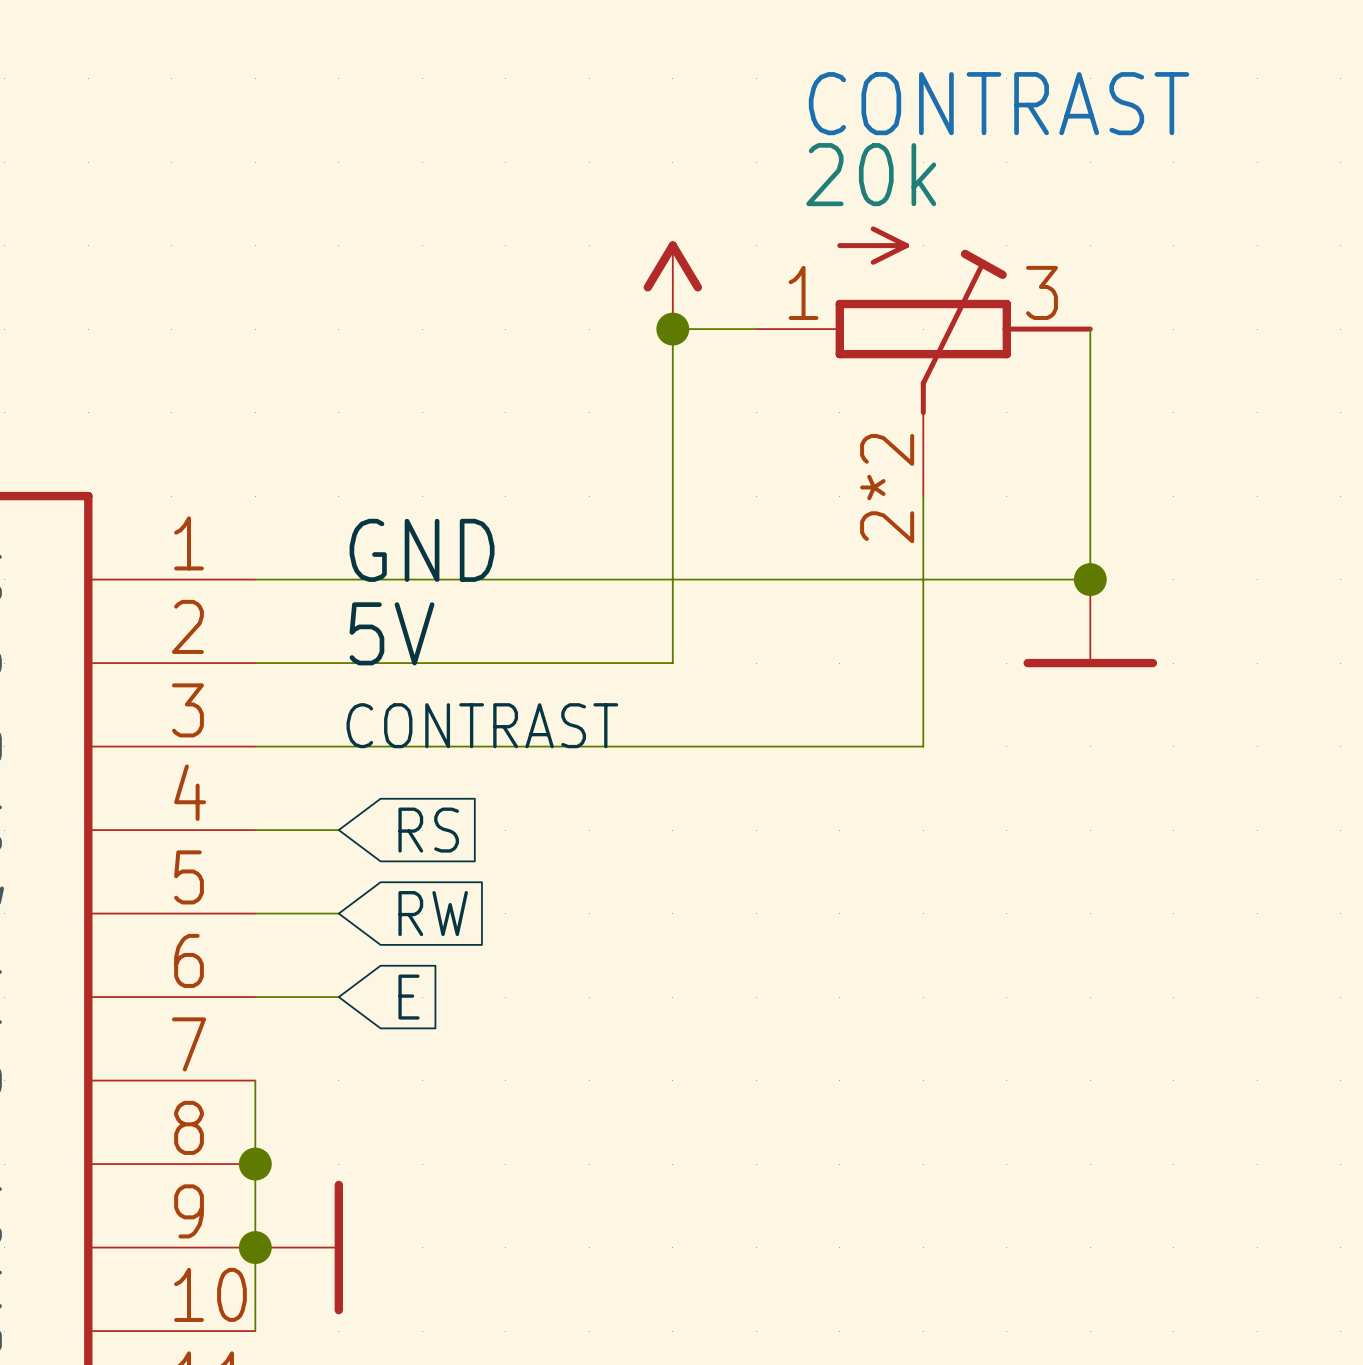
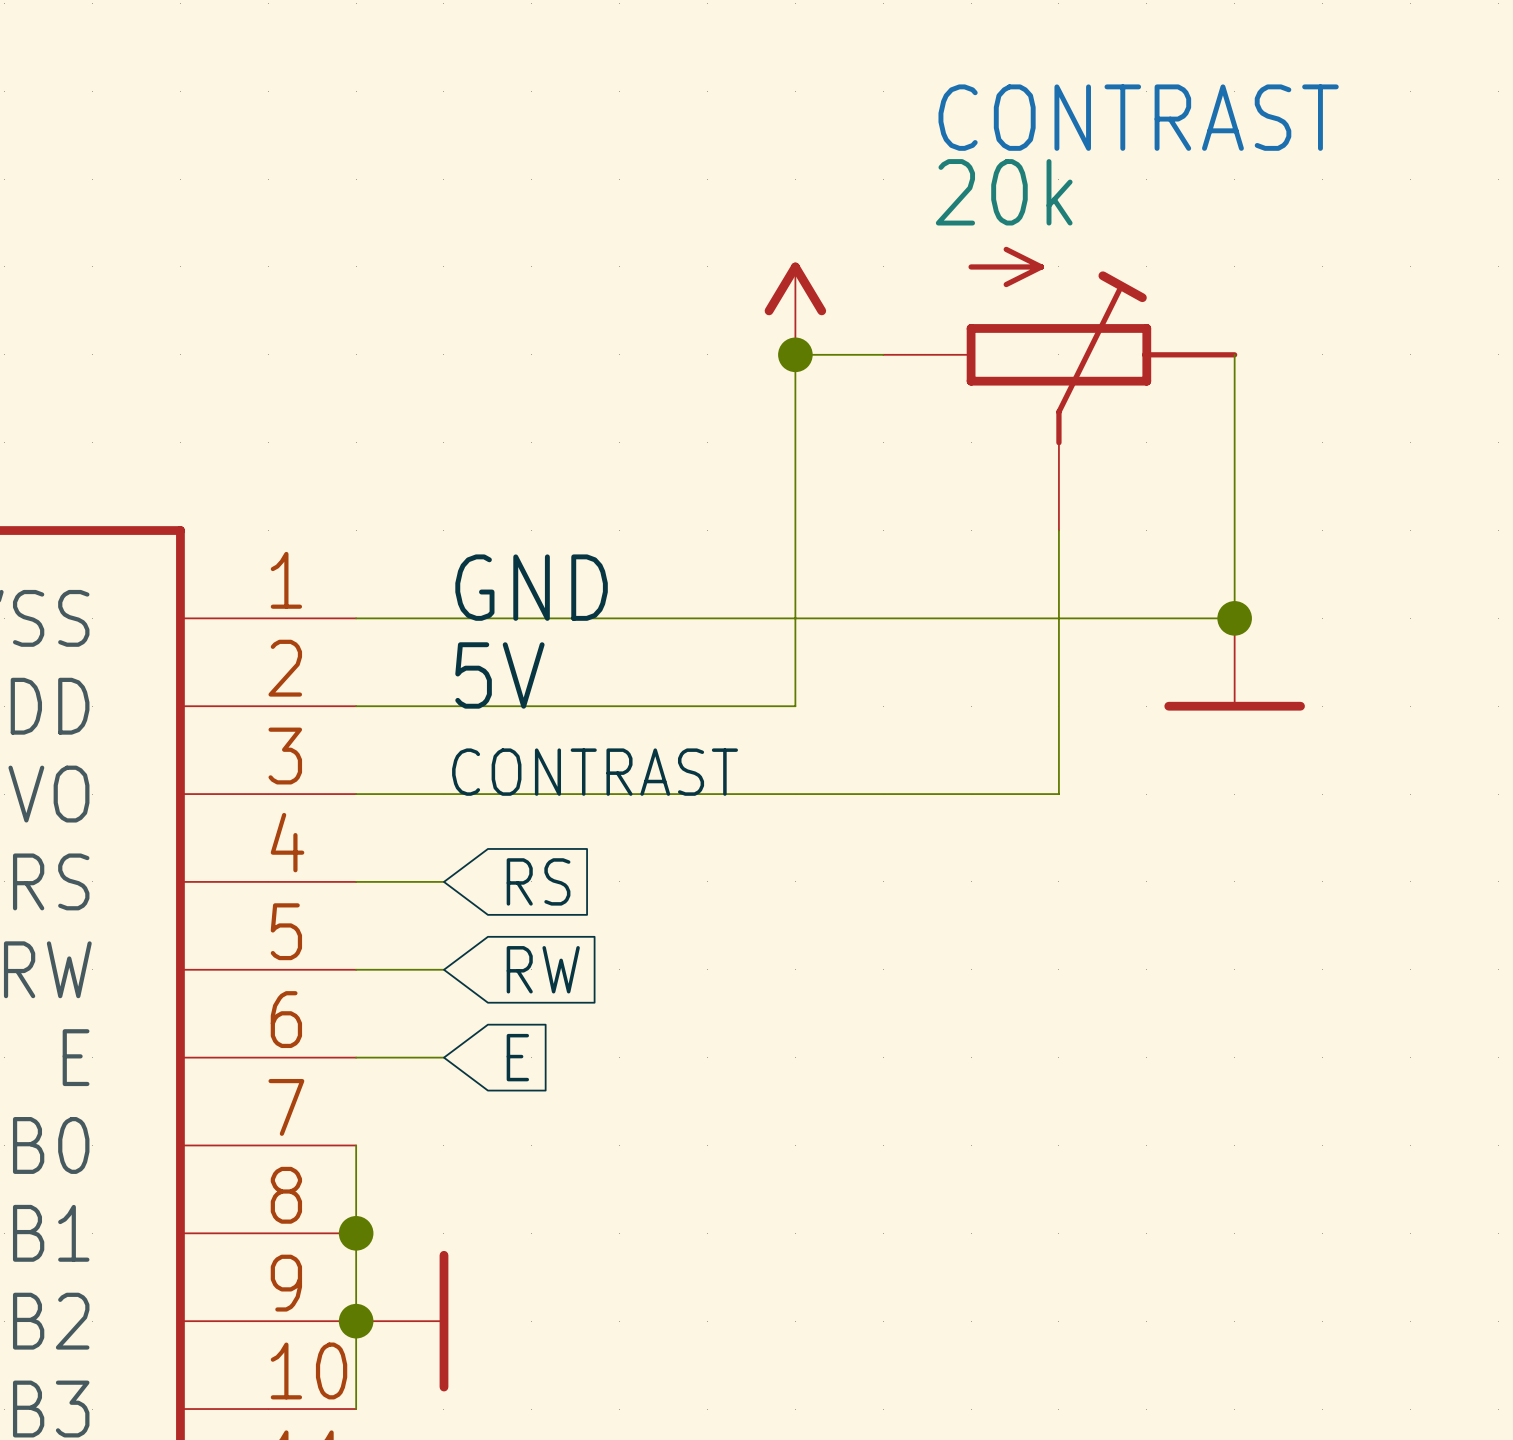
CONTRAST pin number: 1 (803, 292) -> none
CONTRAST pin number: 3 (1042, 292) -> none
CONTRAST pin number: 2*2 (887, 488) -> none

